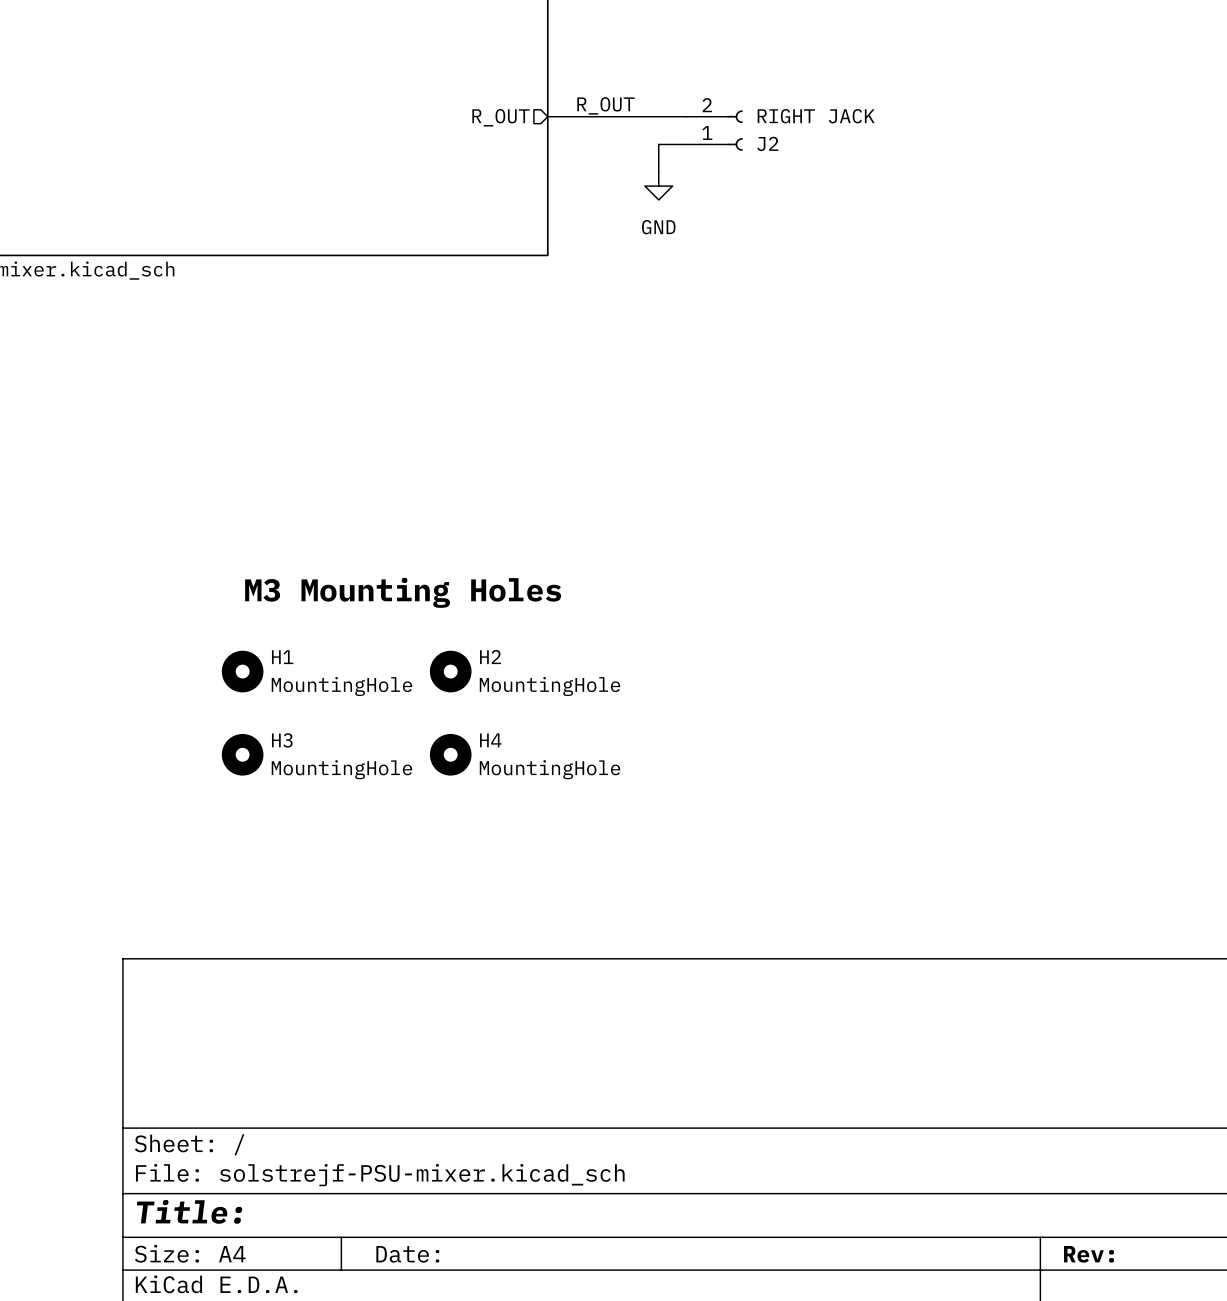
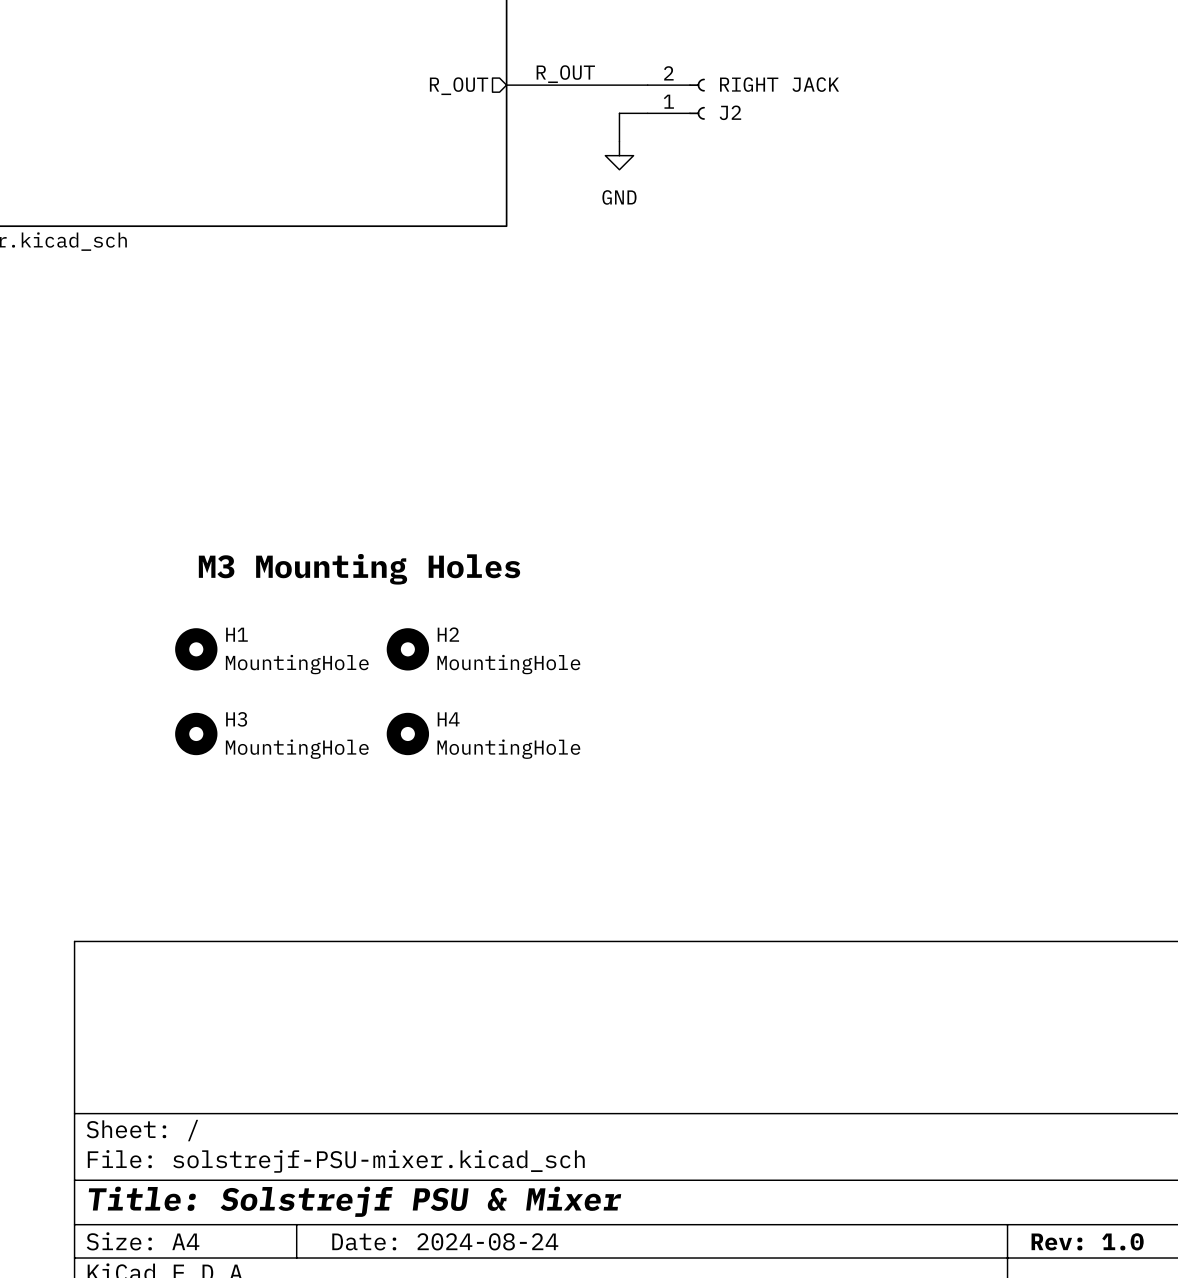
title block: Title: (189, 1211) -> Title: Solstrejf PSU & Mixer (354, 1201)
title block: Date: (407, 1254) -> Date: 2024-08-24 (445, 1241)
title block: Rev: (1088, 1254) -> Rev: 1.0 (1087, 1241)

